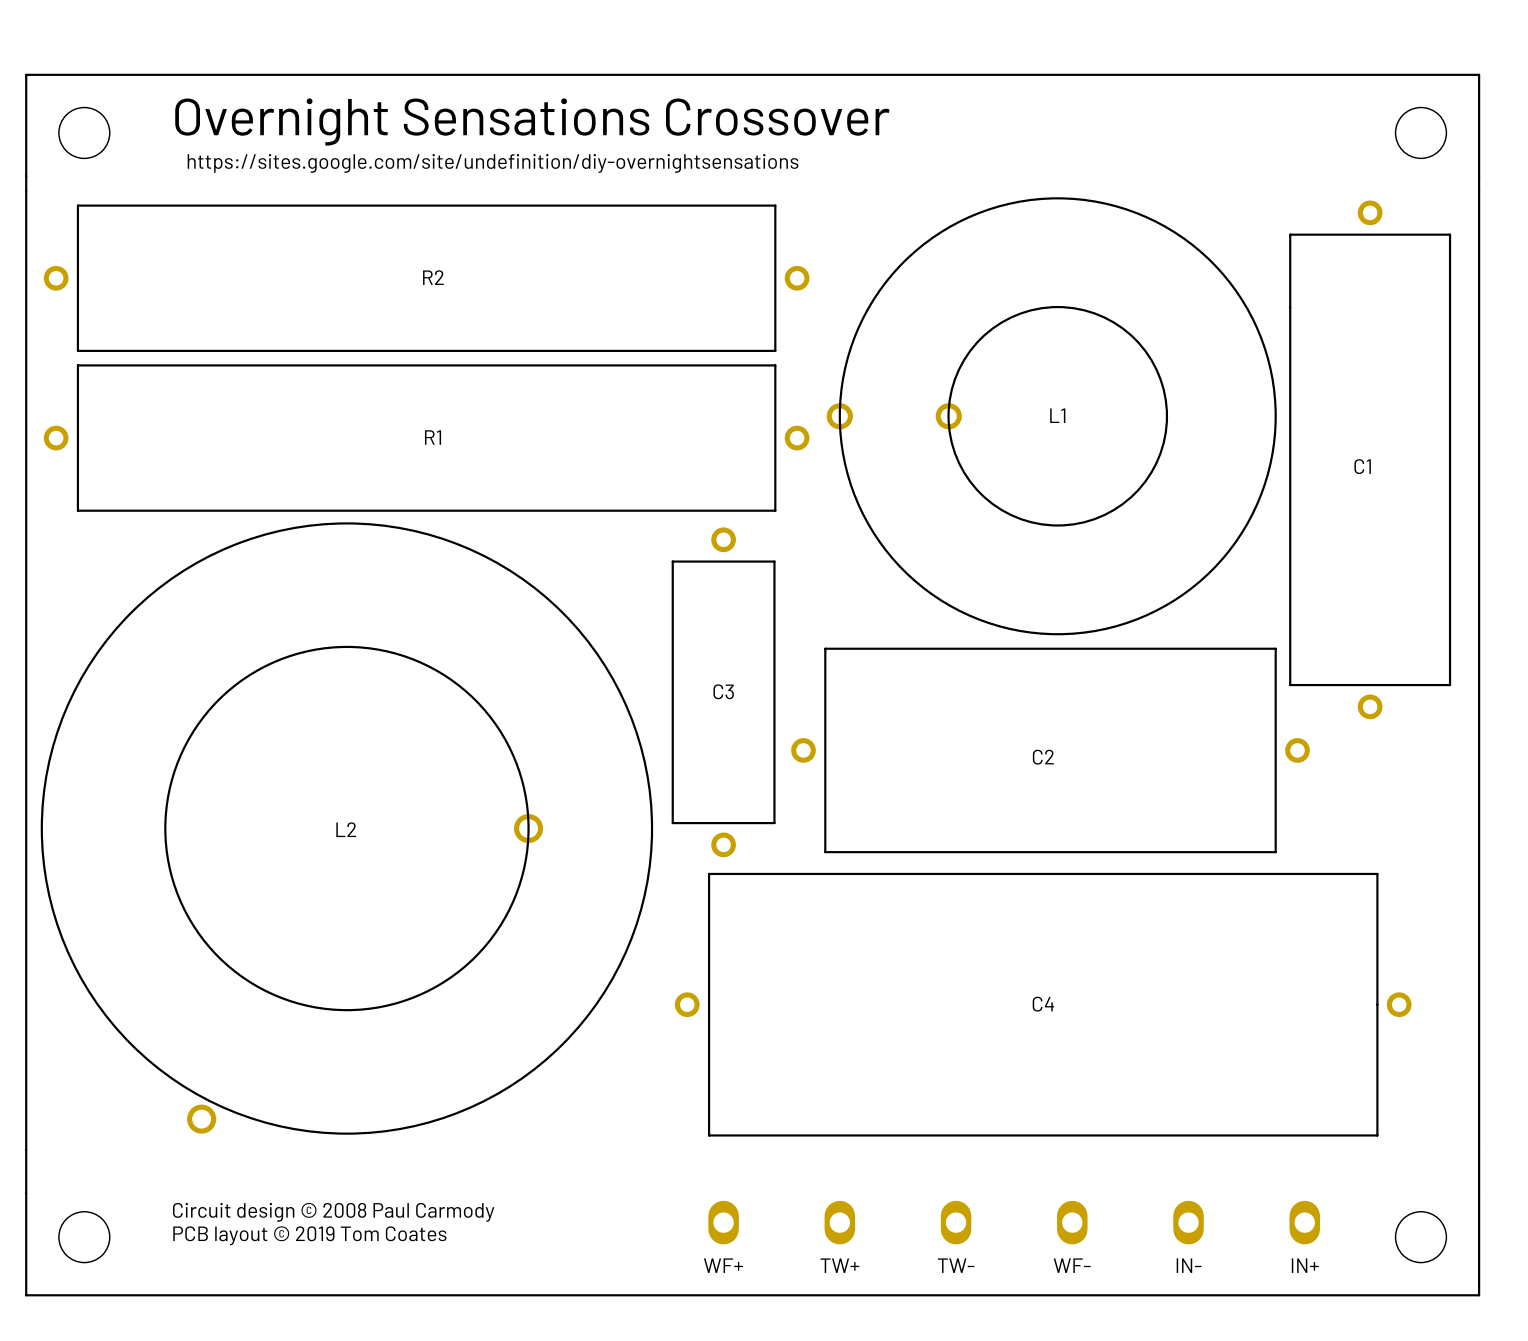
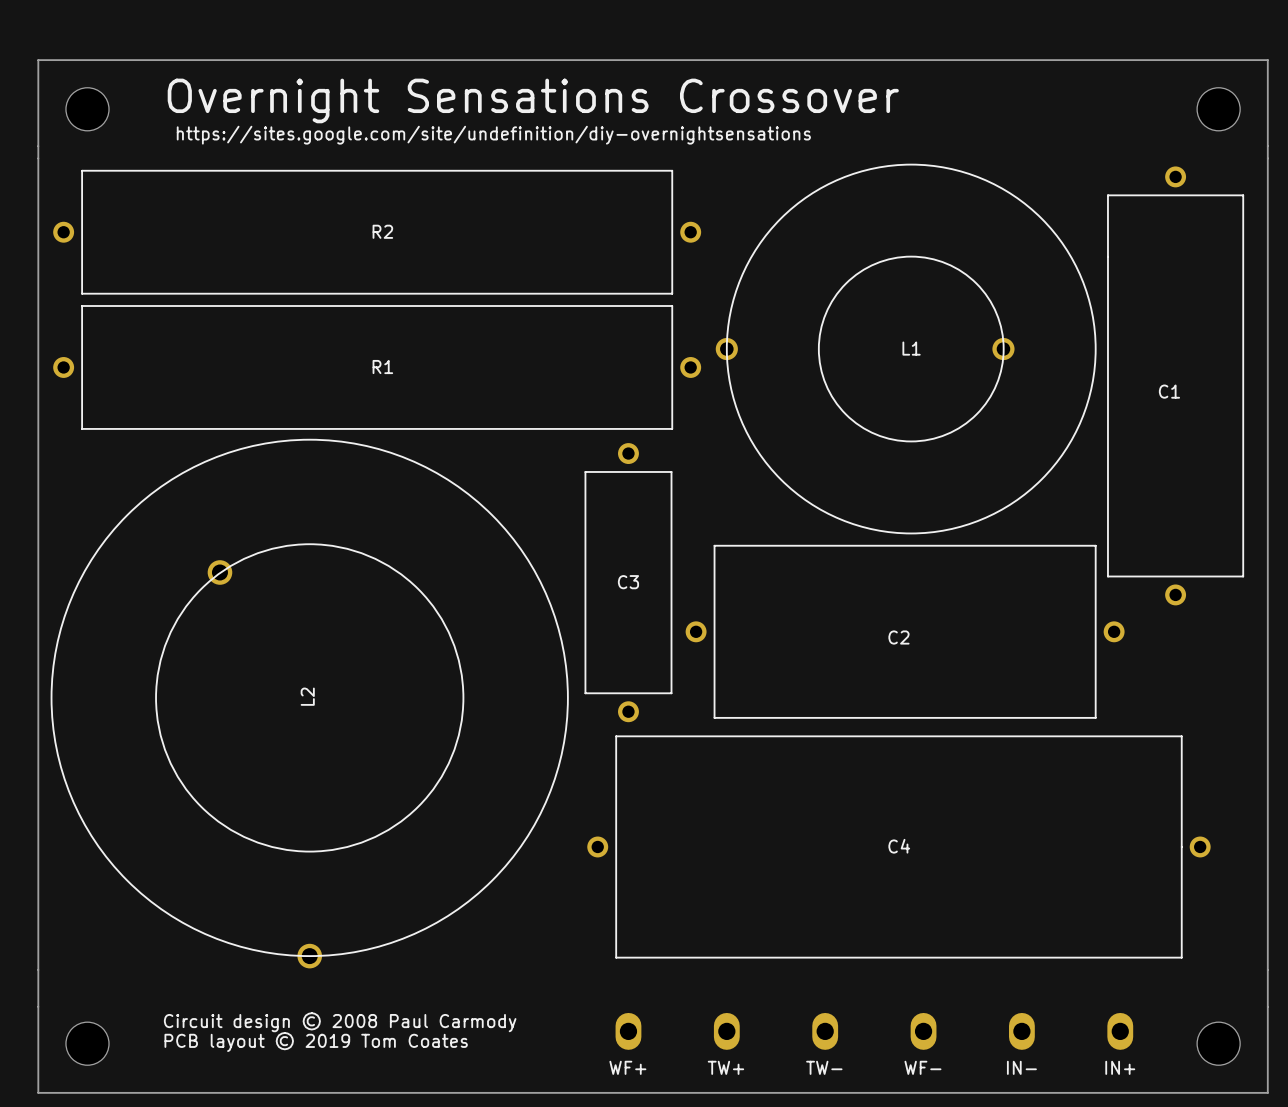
L1 footprint: [826, 197, 1277, 636] -> [715, 163, 1097, 535]
L2 footprint: [40, 522, 654, 1135] -> [50, 438, 569, 969]

